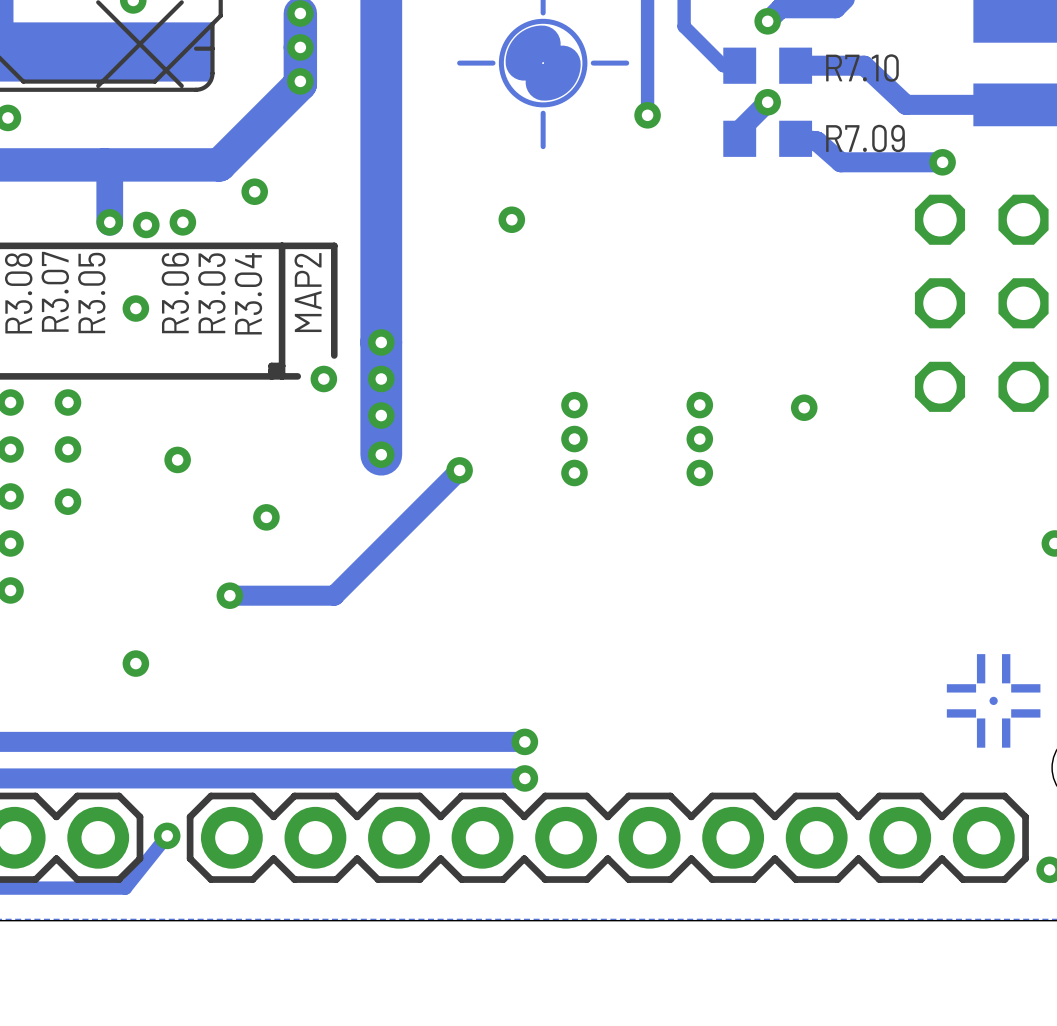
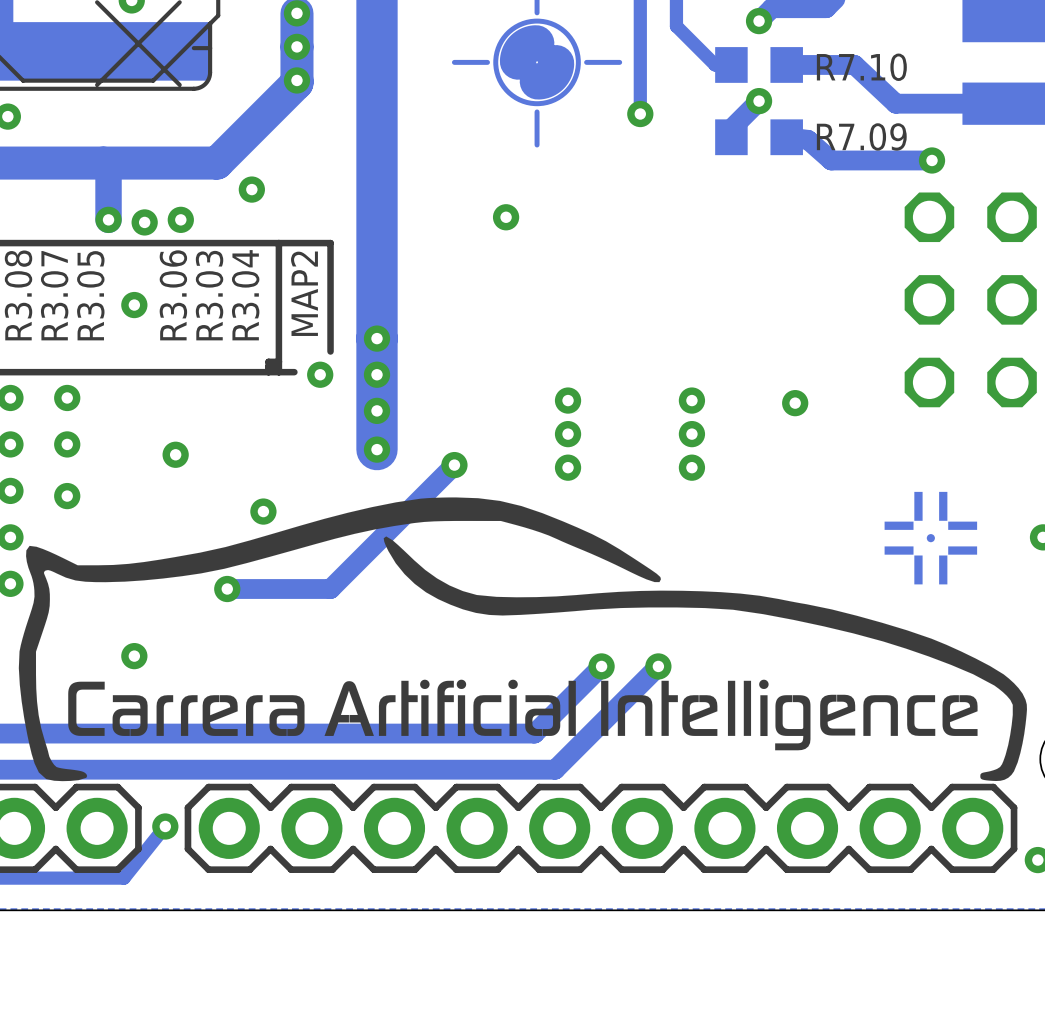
drawing: none -> [18, 497, 1027, 782]
track: none -> (601, 666) (534, 733) (518, 733)
via: none -> (601, 666)
track: none -> (658, 666) (555, 769) (518, 769)
via: none -> (658, 666)
drawing position: (993, 700) -> (930, 538)
via: (524, 741) -> none
via: (524, 778) -> none

